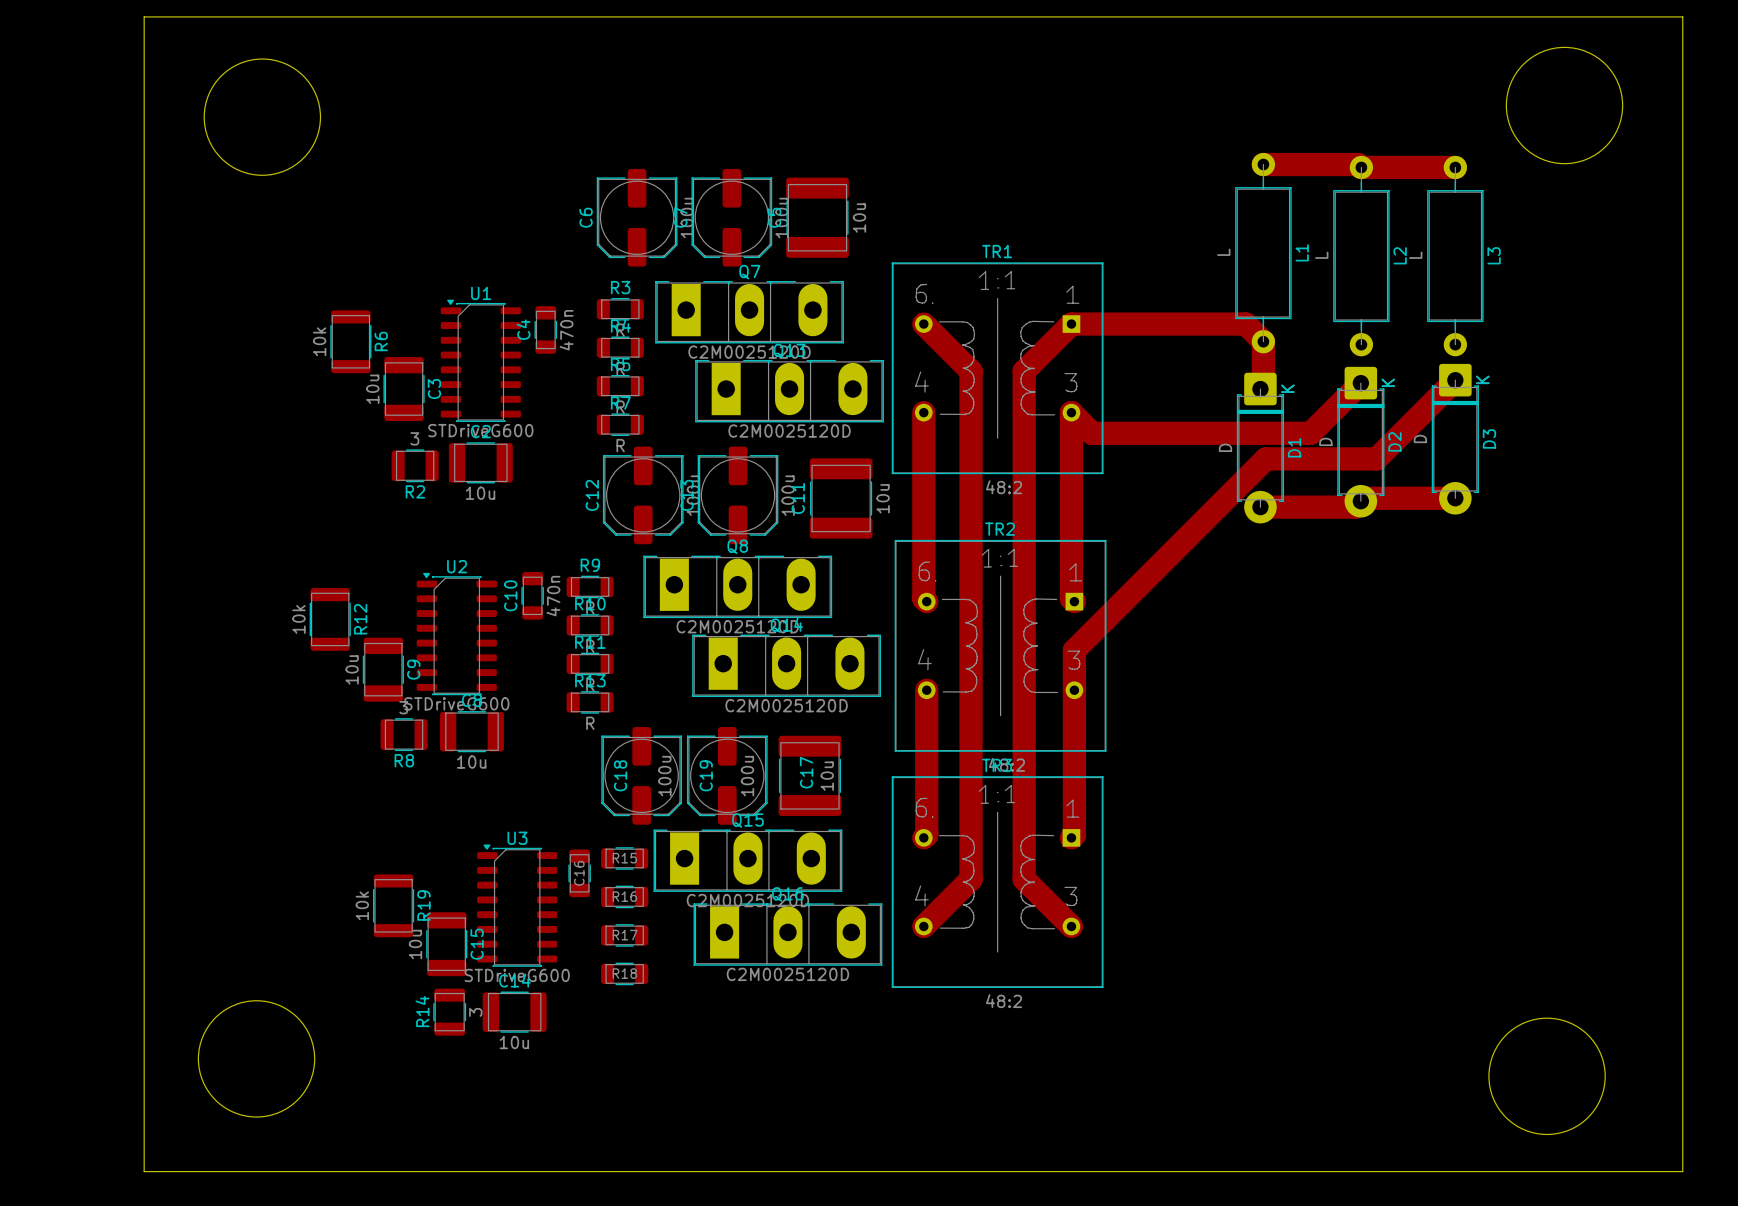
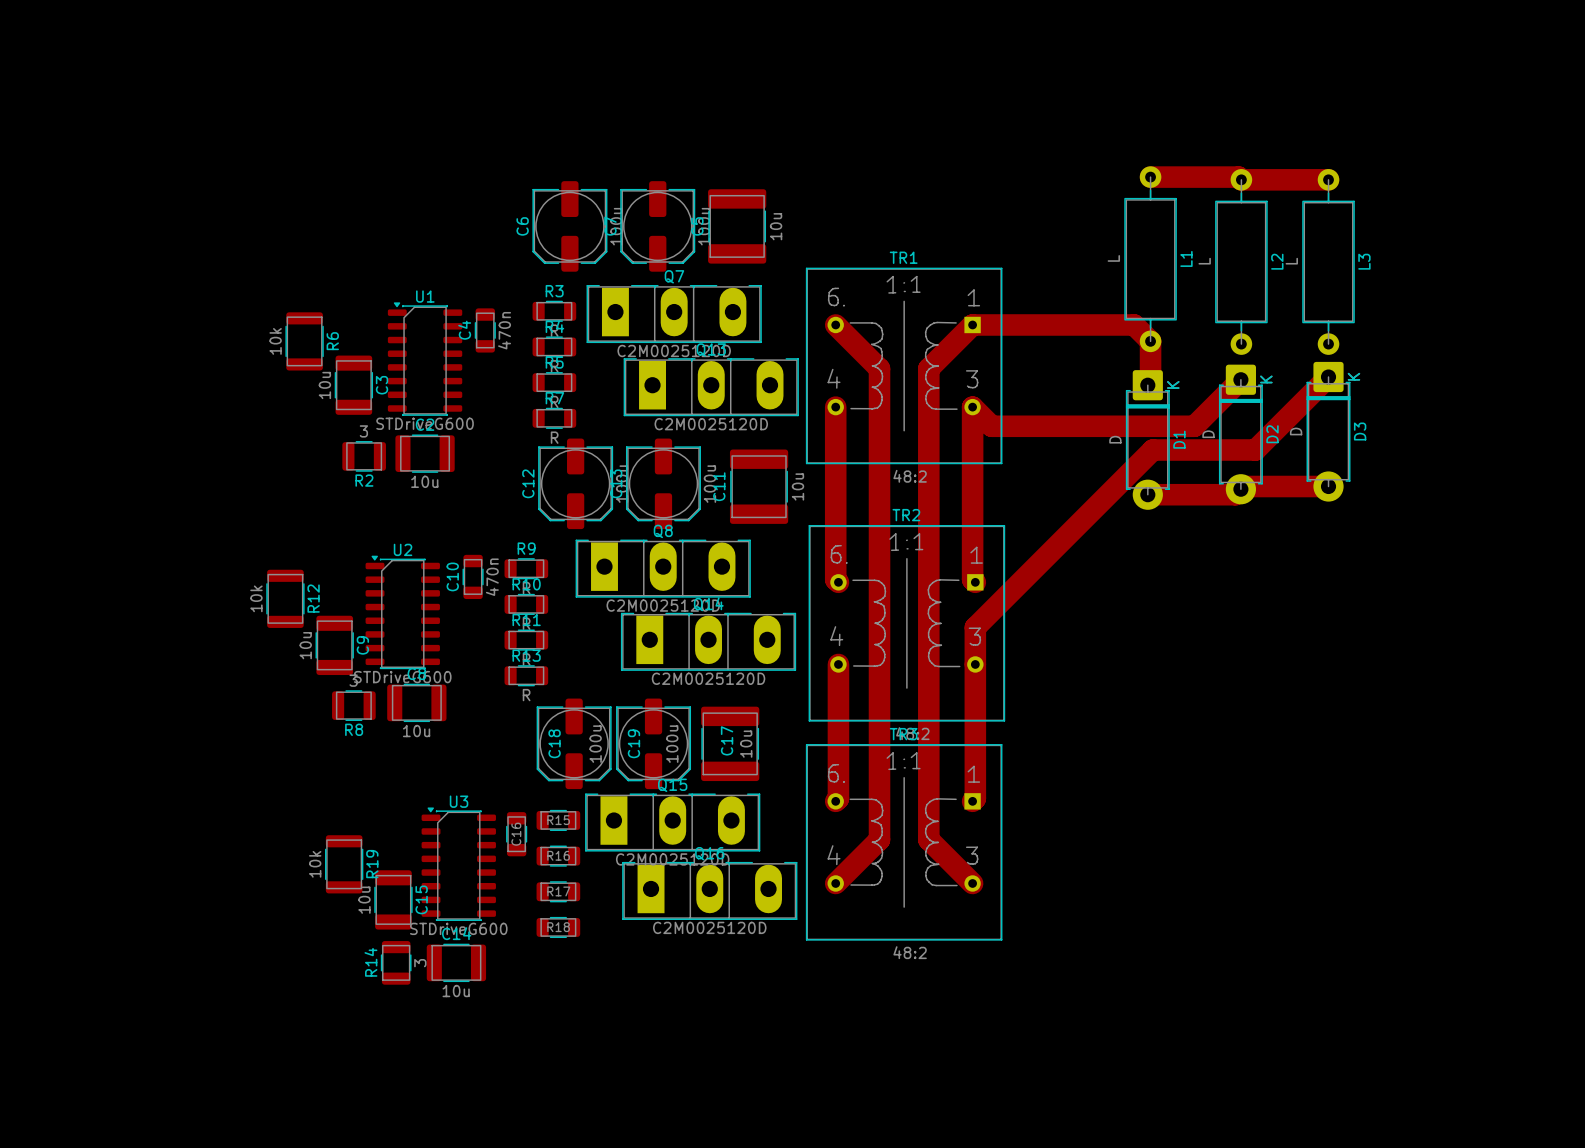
board edge: (144, 16) (1682, 16) (1682, 1171) (144, 1171) (144, 16) -> none
round board edge: [1506, 47, 1623, 164] -> none
round board edge: [203, 58, 321, 176] -> none
round board edge: [198, 1000, 315, 1118] -> none
round board edge: [1488, 1017, 1606, 1135] -> none

